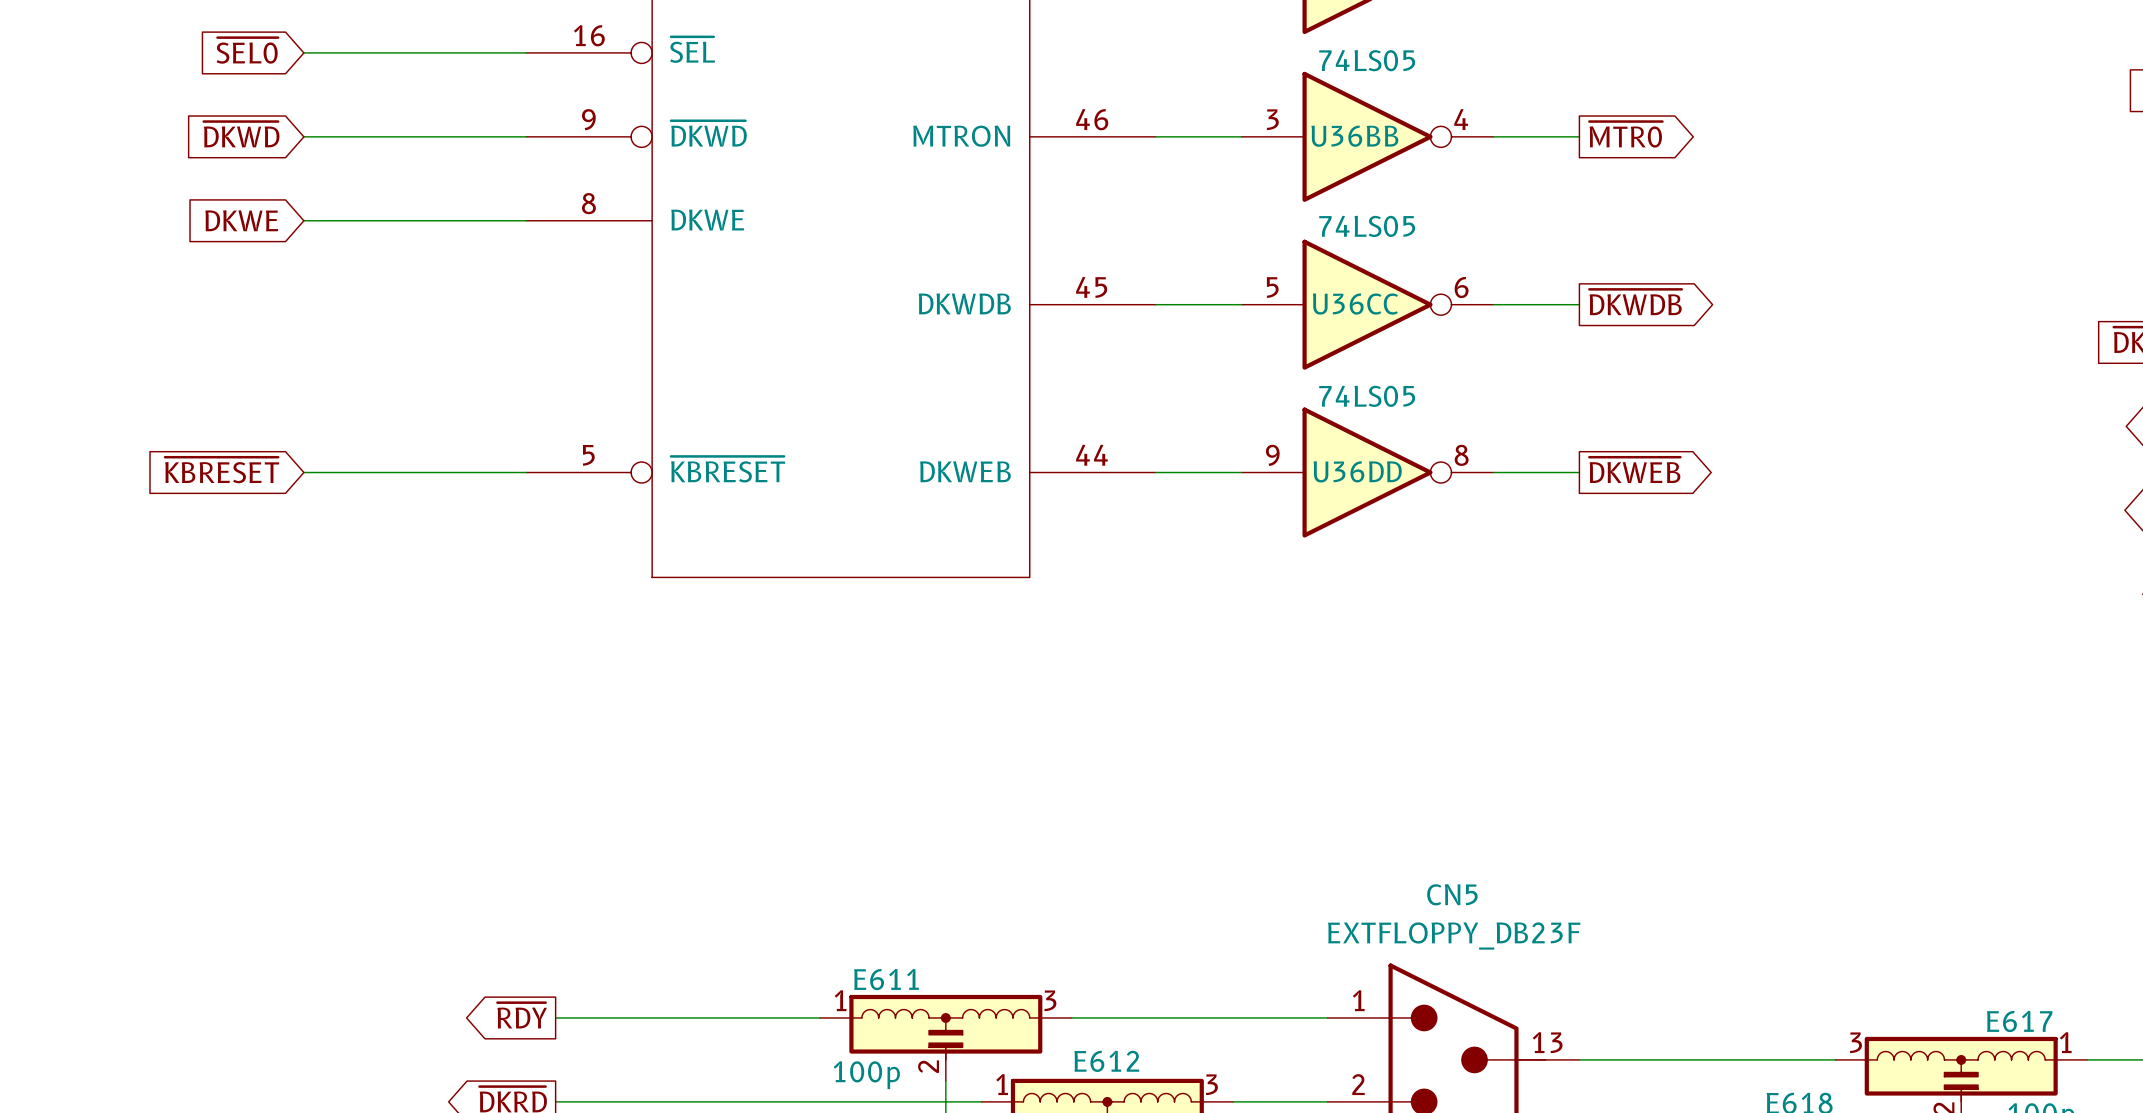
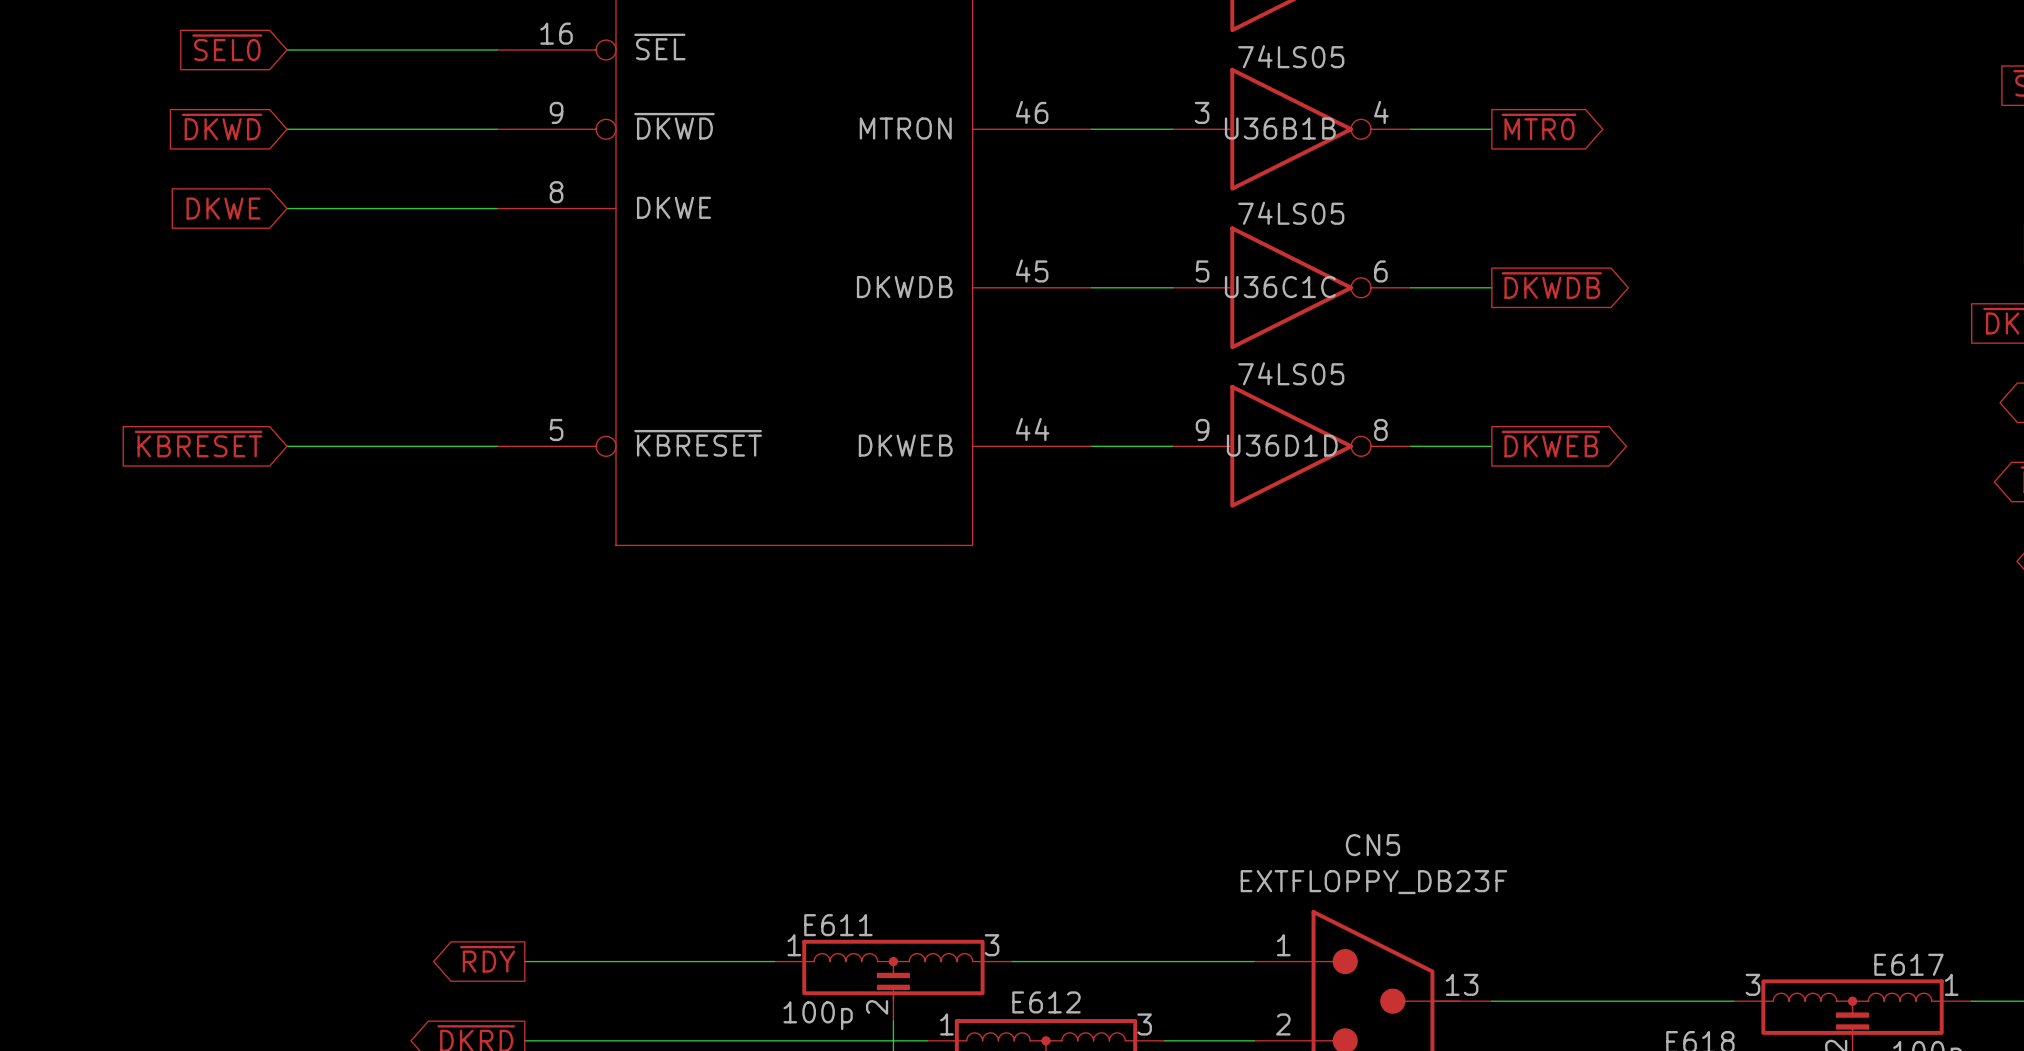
U36BB name: U36BB (1354, 136) -> U36B1B (1280, 128)
U36CC name: U36CC (1355, 304) -> U36C1C (1280, 287)
U36DD name: U36DD (1357, 471) -> U36D1D (1282, 445)

